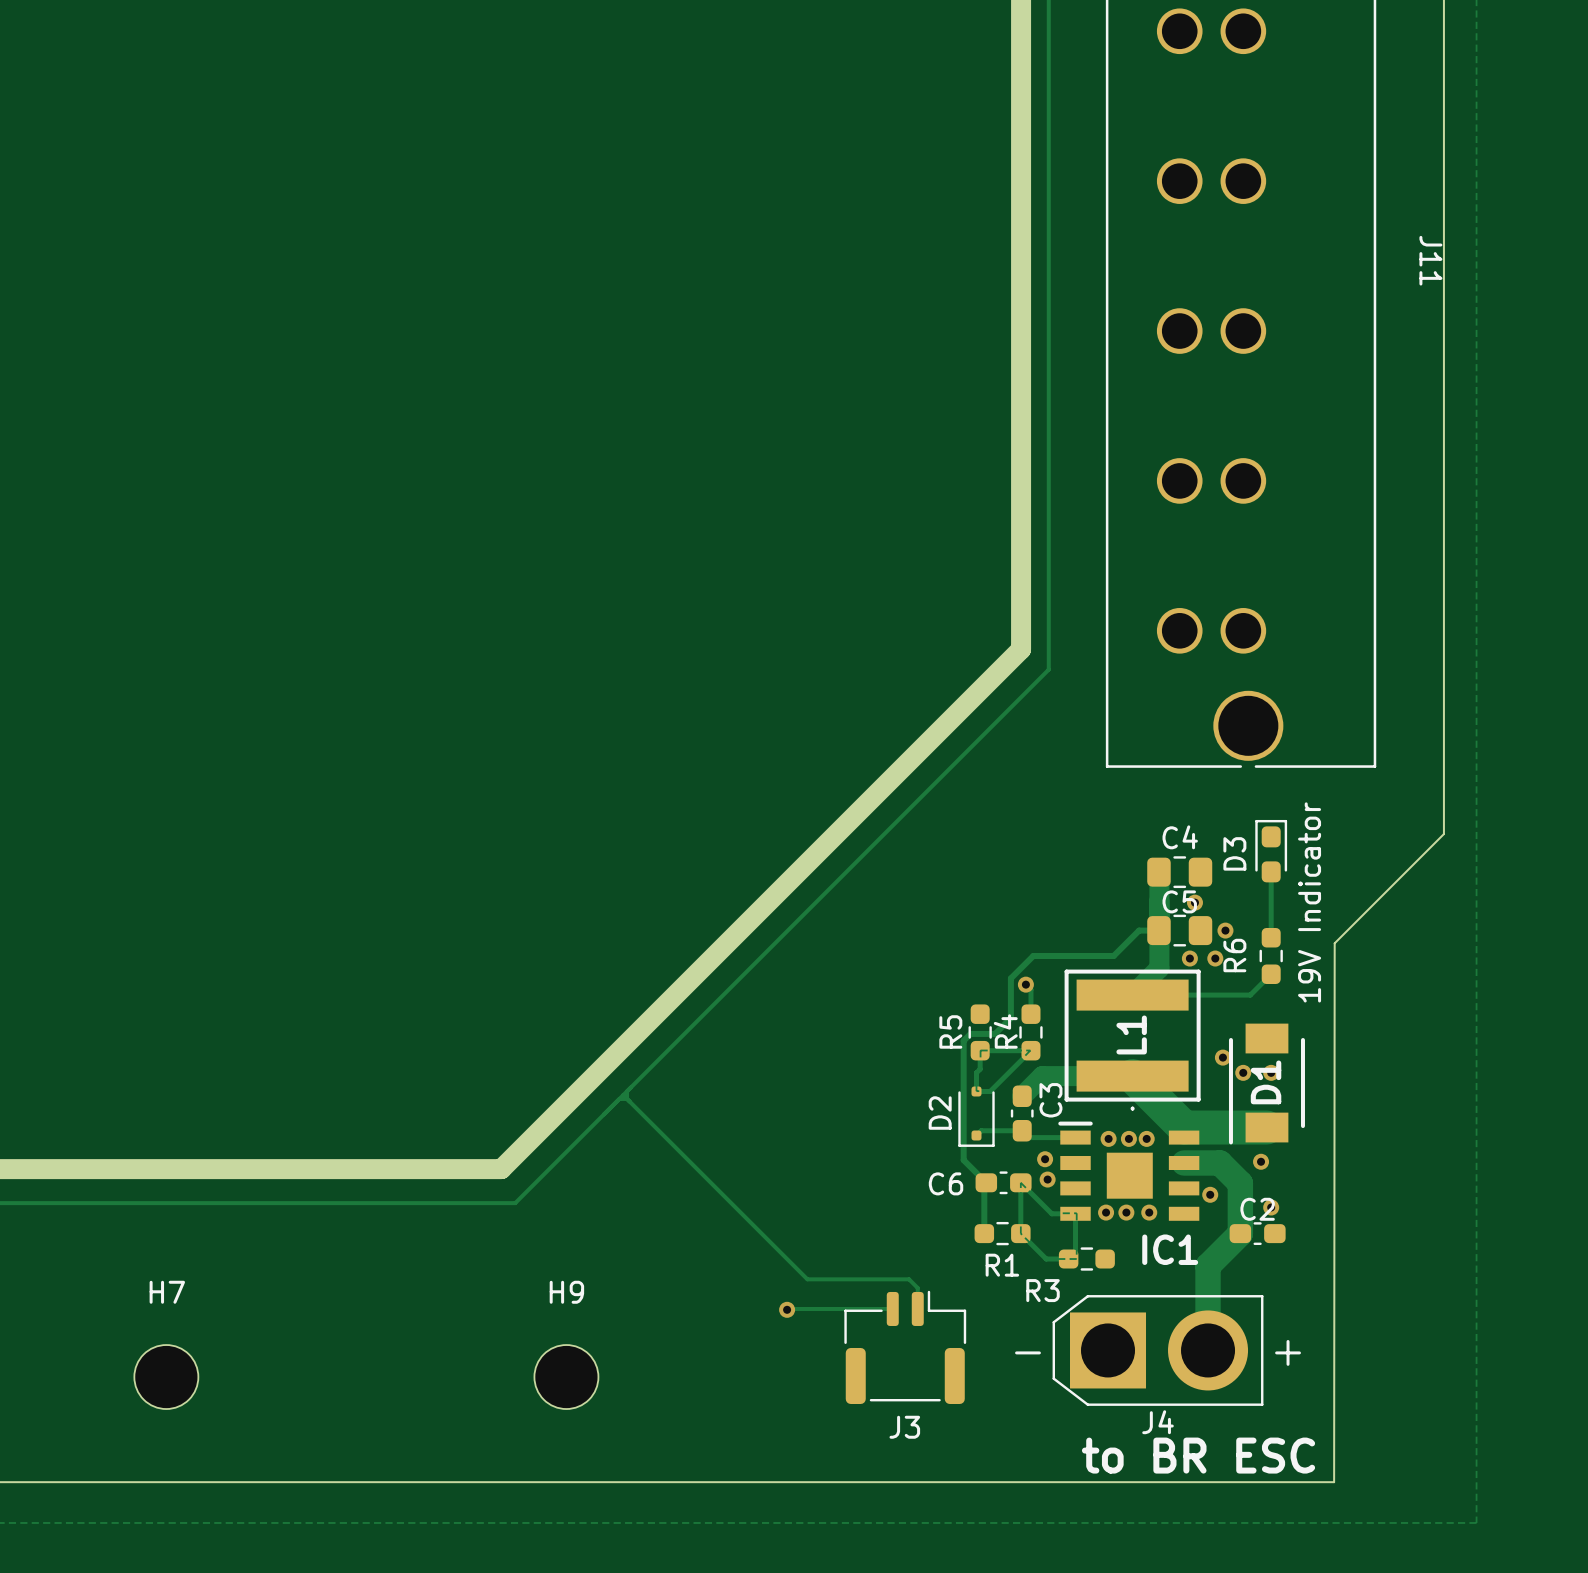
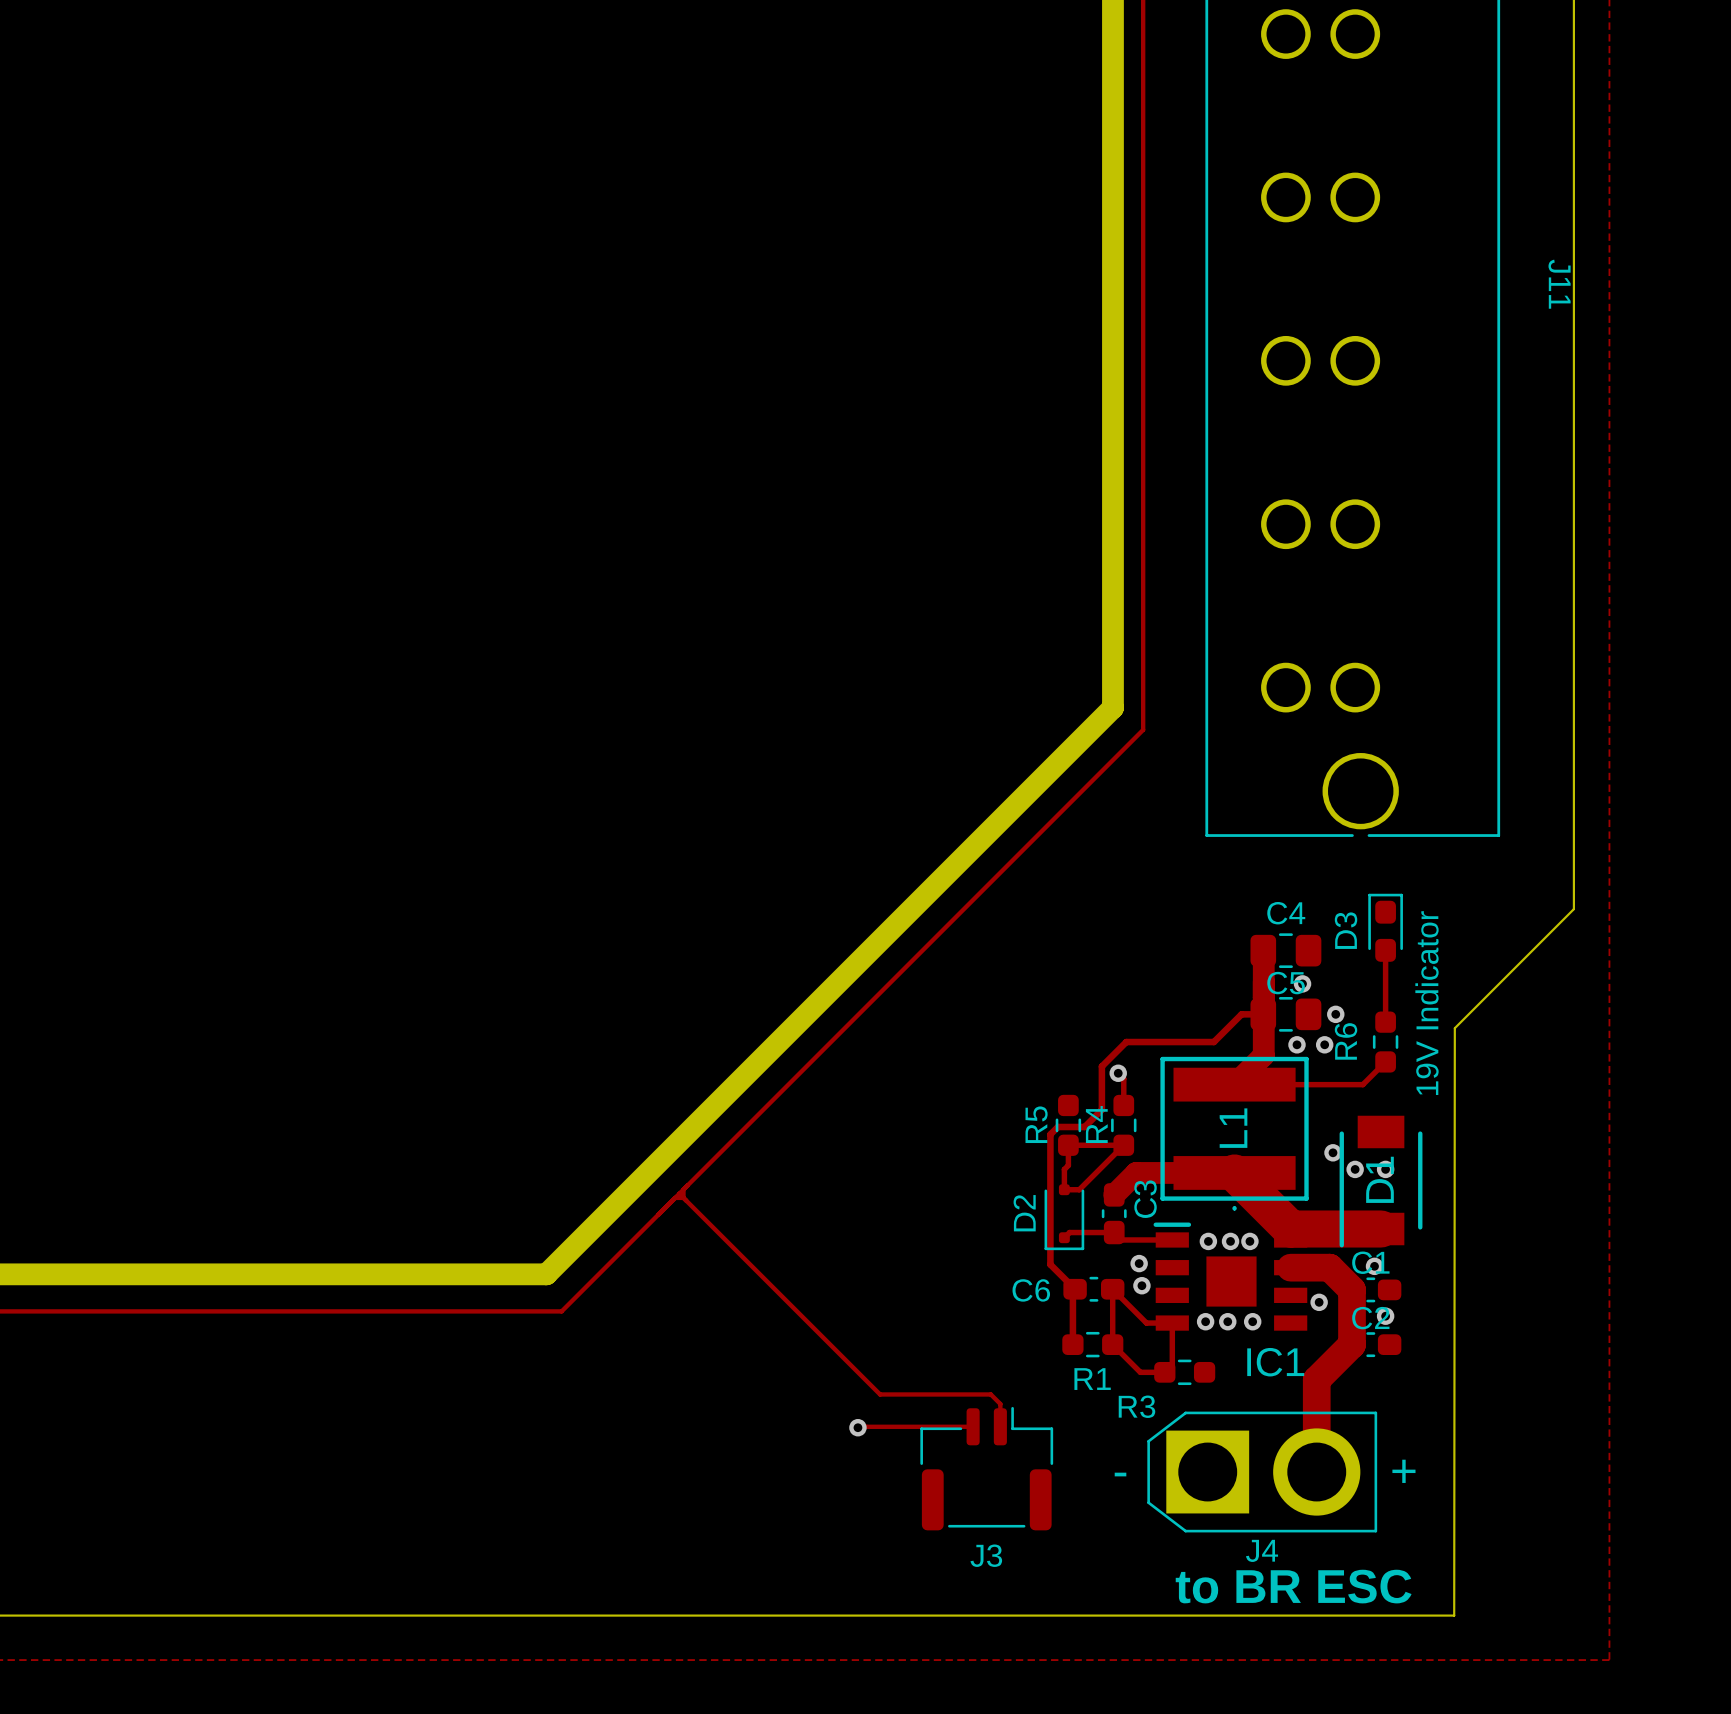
C1: none -> (1370, 1289)
H7: (166, 1377) -> none
H9: (566, 1377) -> none

